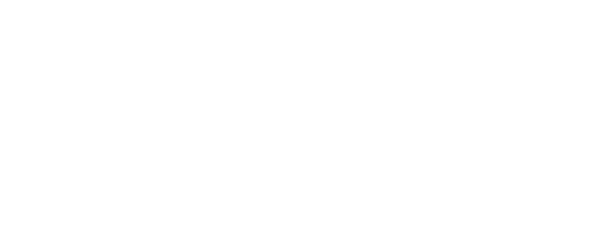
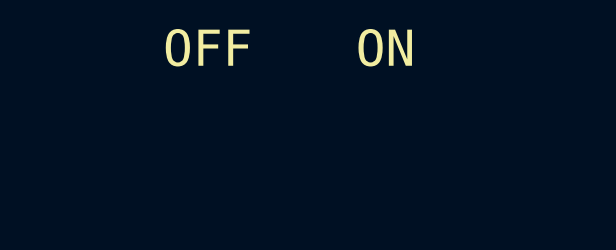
text: none -> OFF (207, 47)
text: none -> ON (385, 47)

